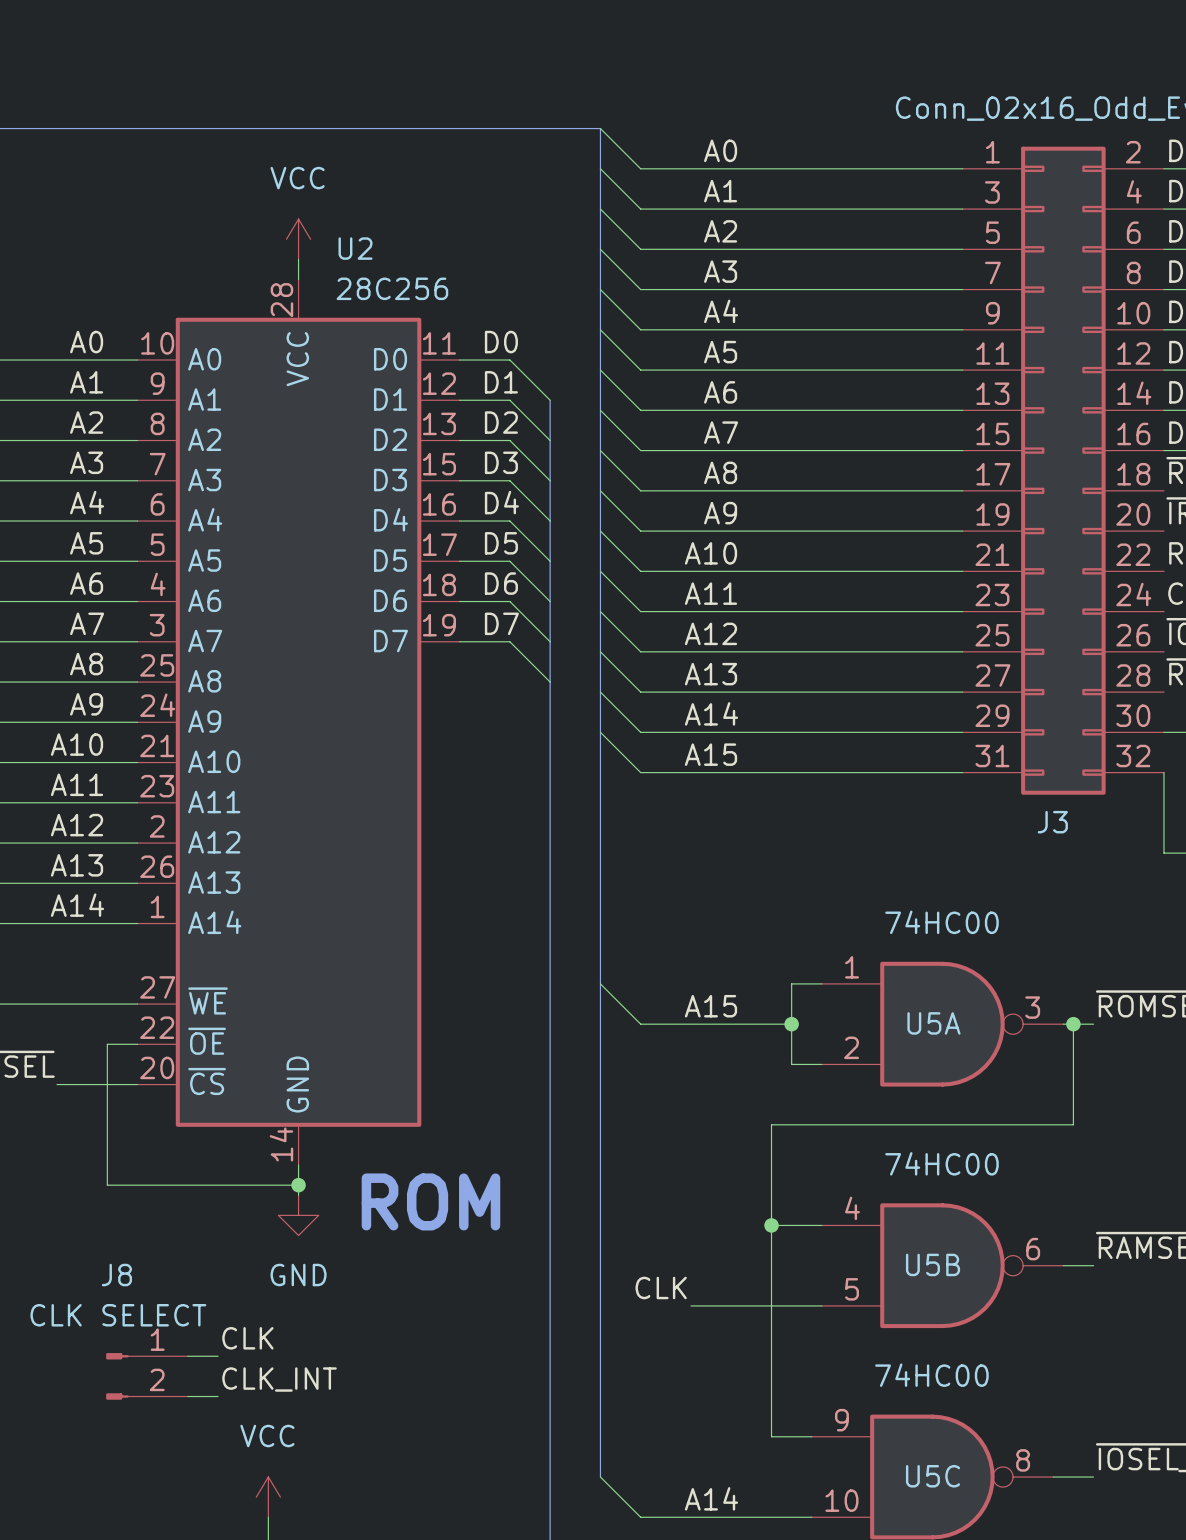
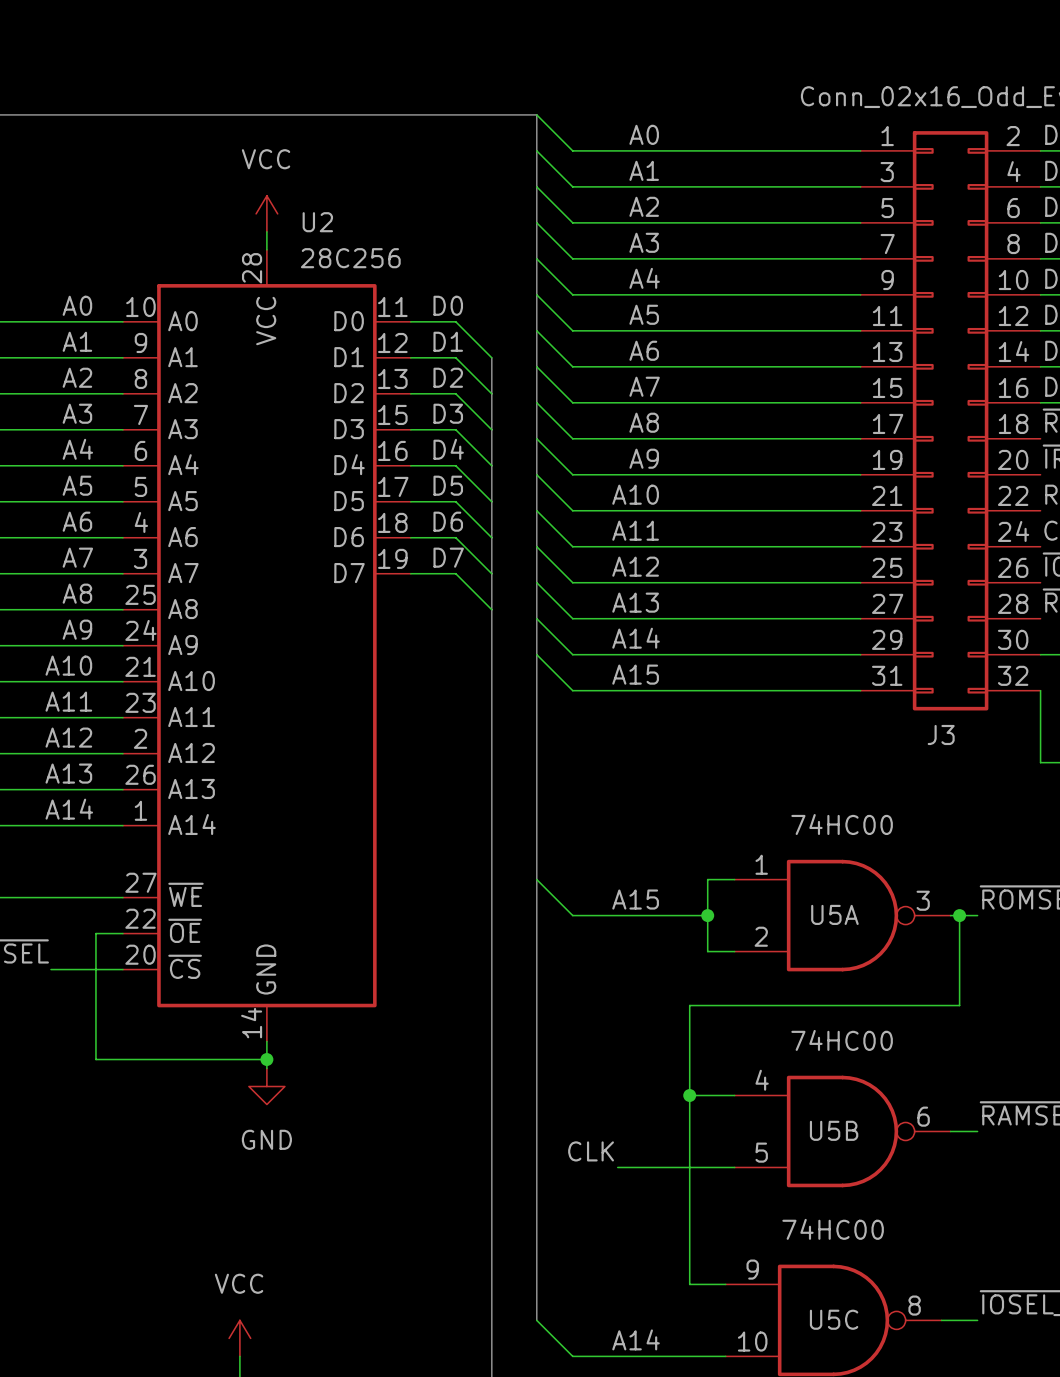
text: ROM (430, 1201) -> none
label: CLK (247, 1338) -> none
wire: (187, 1356) (218, 1356) -> none
J8: CLK SELECT (147, 1376) -> none
label: CLK_INT (279, 1379) -> none
wire: (187, 1396) (218, 1396) -> none

